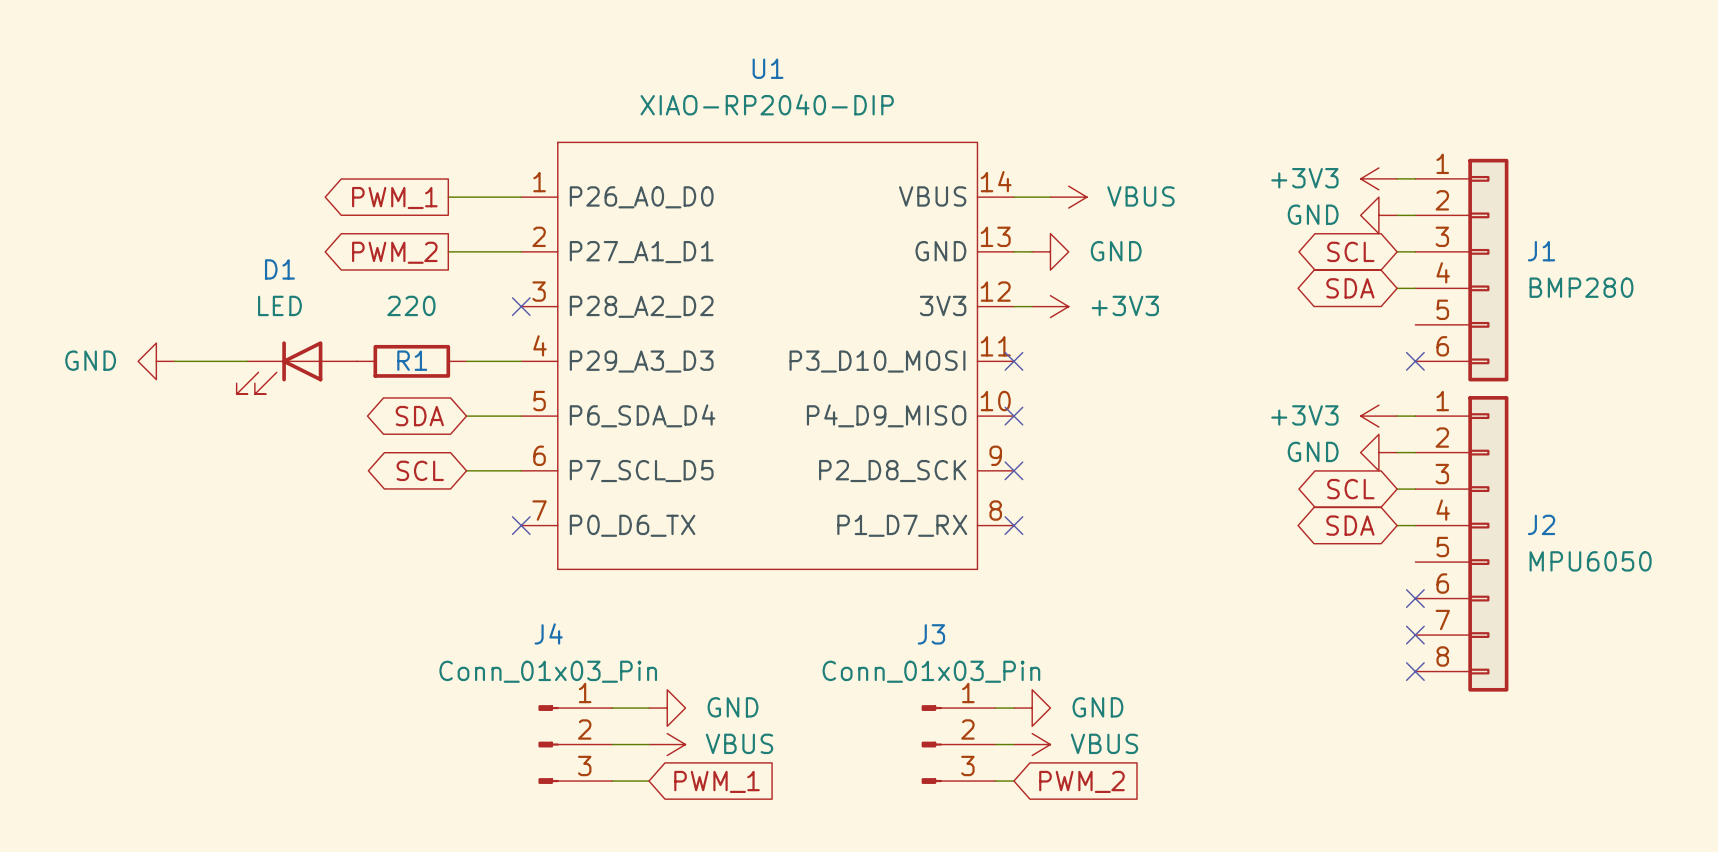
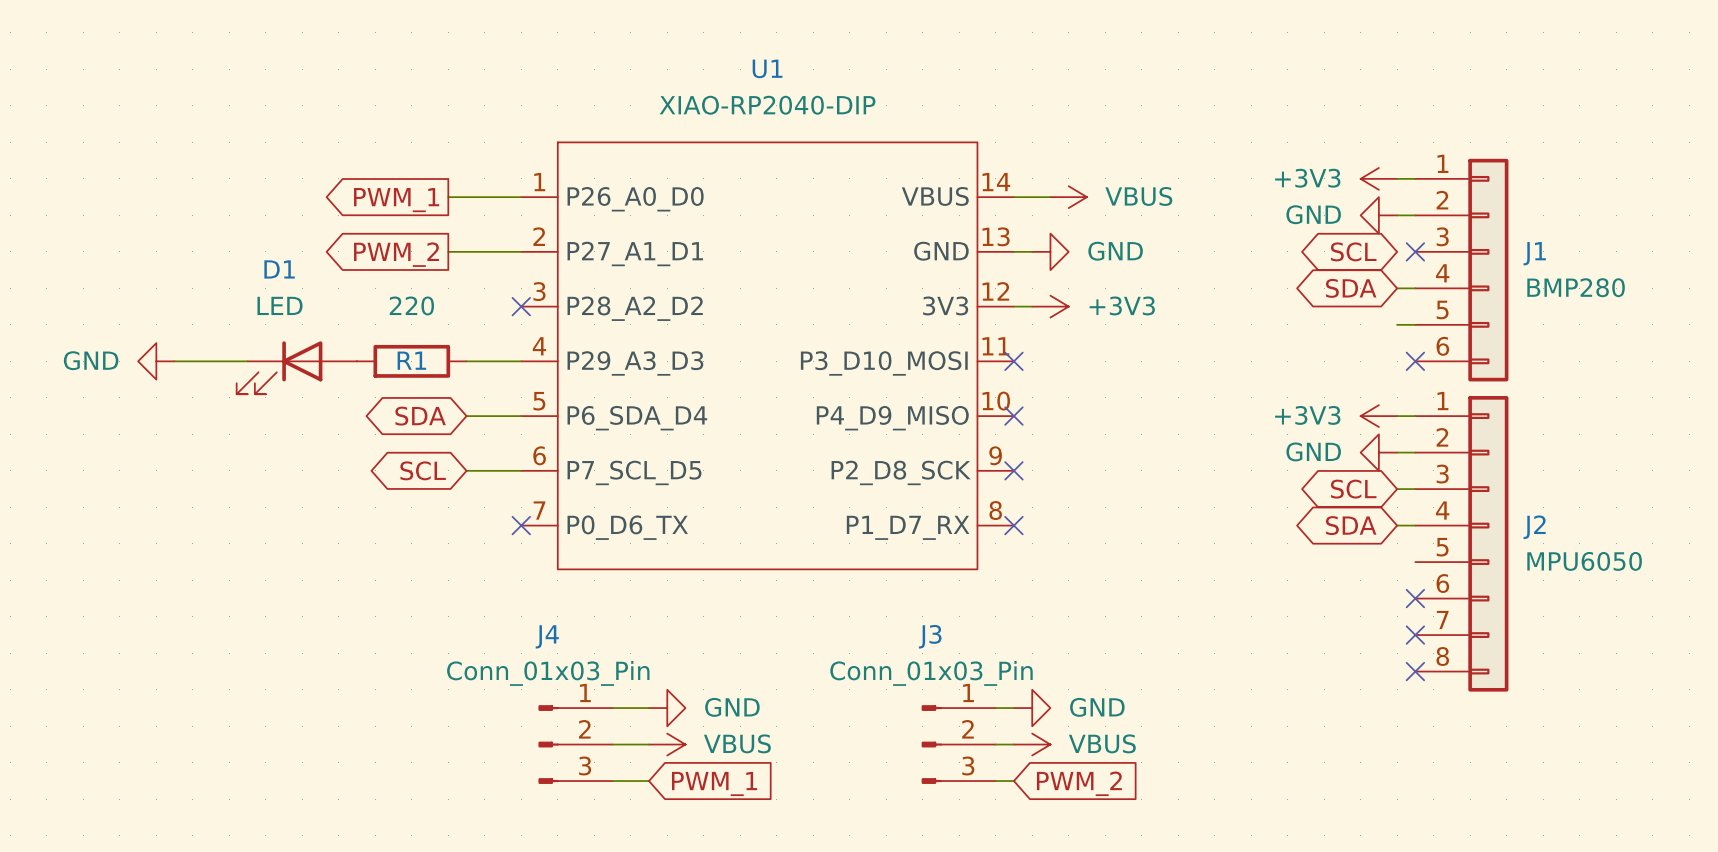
wire: (1397, 251) (1415, 251) -> (1397, 324) (1415, 324)
no-connect mark: none -> (1415, 251)

